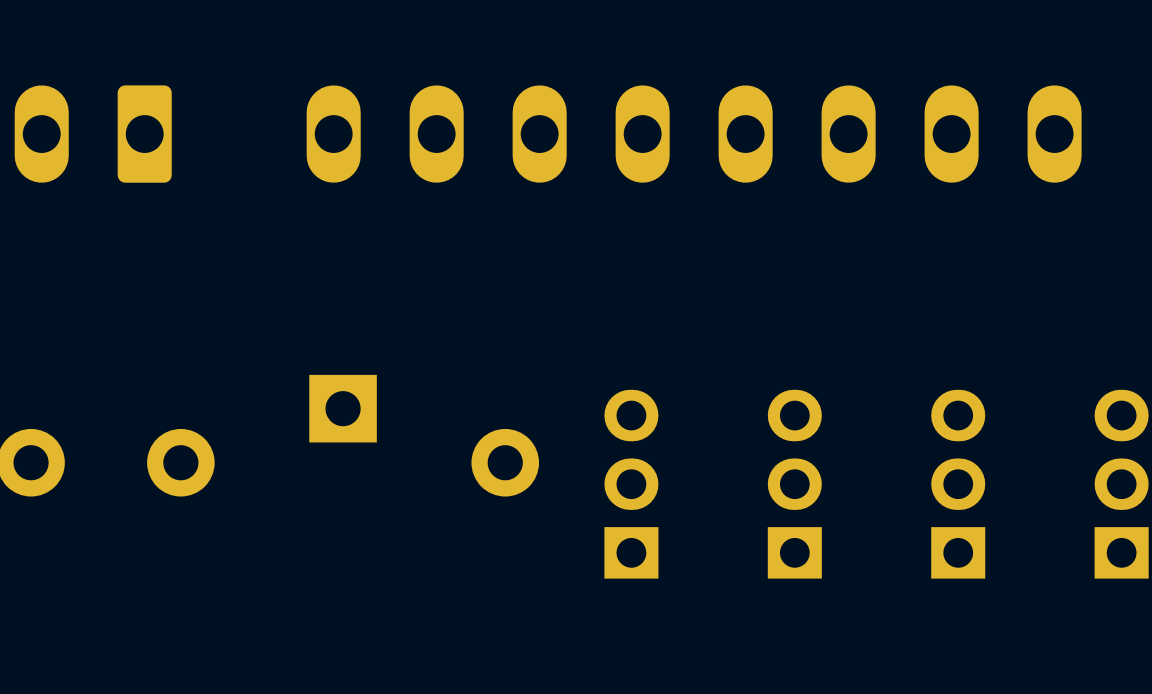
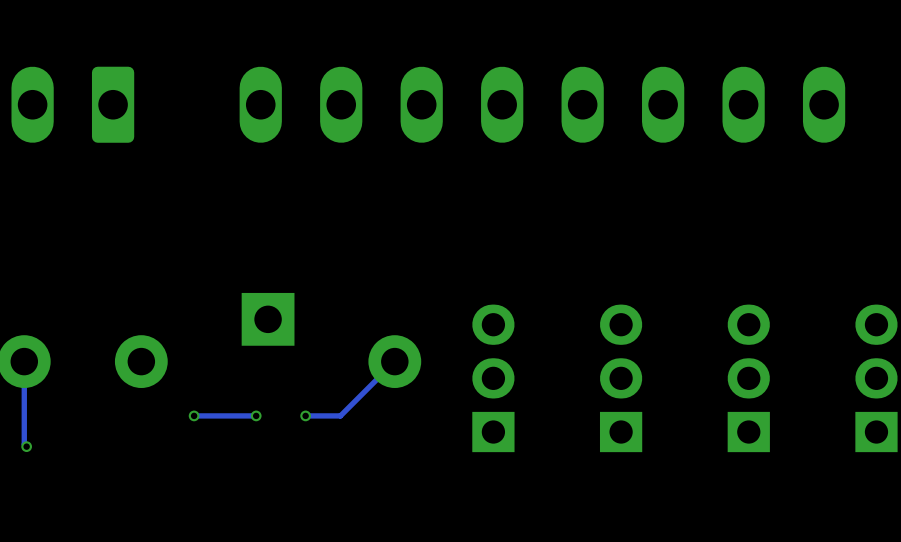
track: none -> (24, 361) (24, 444) (26, 446)
track: none -> (394, 361) (340, 415) (305, 415)
via: none -> (194, 415)
track: none -> (256, 415) (194, 415)
via: none -> (256, 415)
via: none -> (305, 415)
via: none -> (26, 446)

